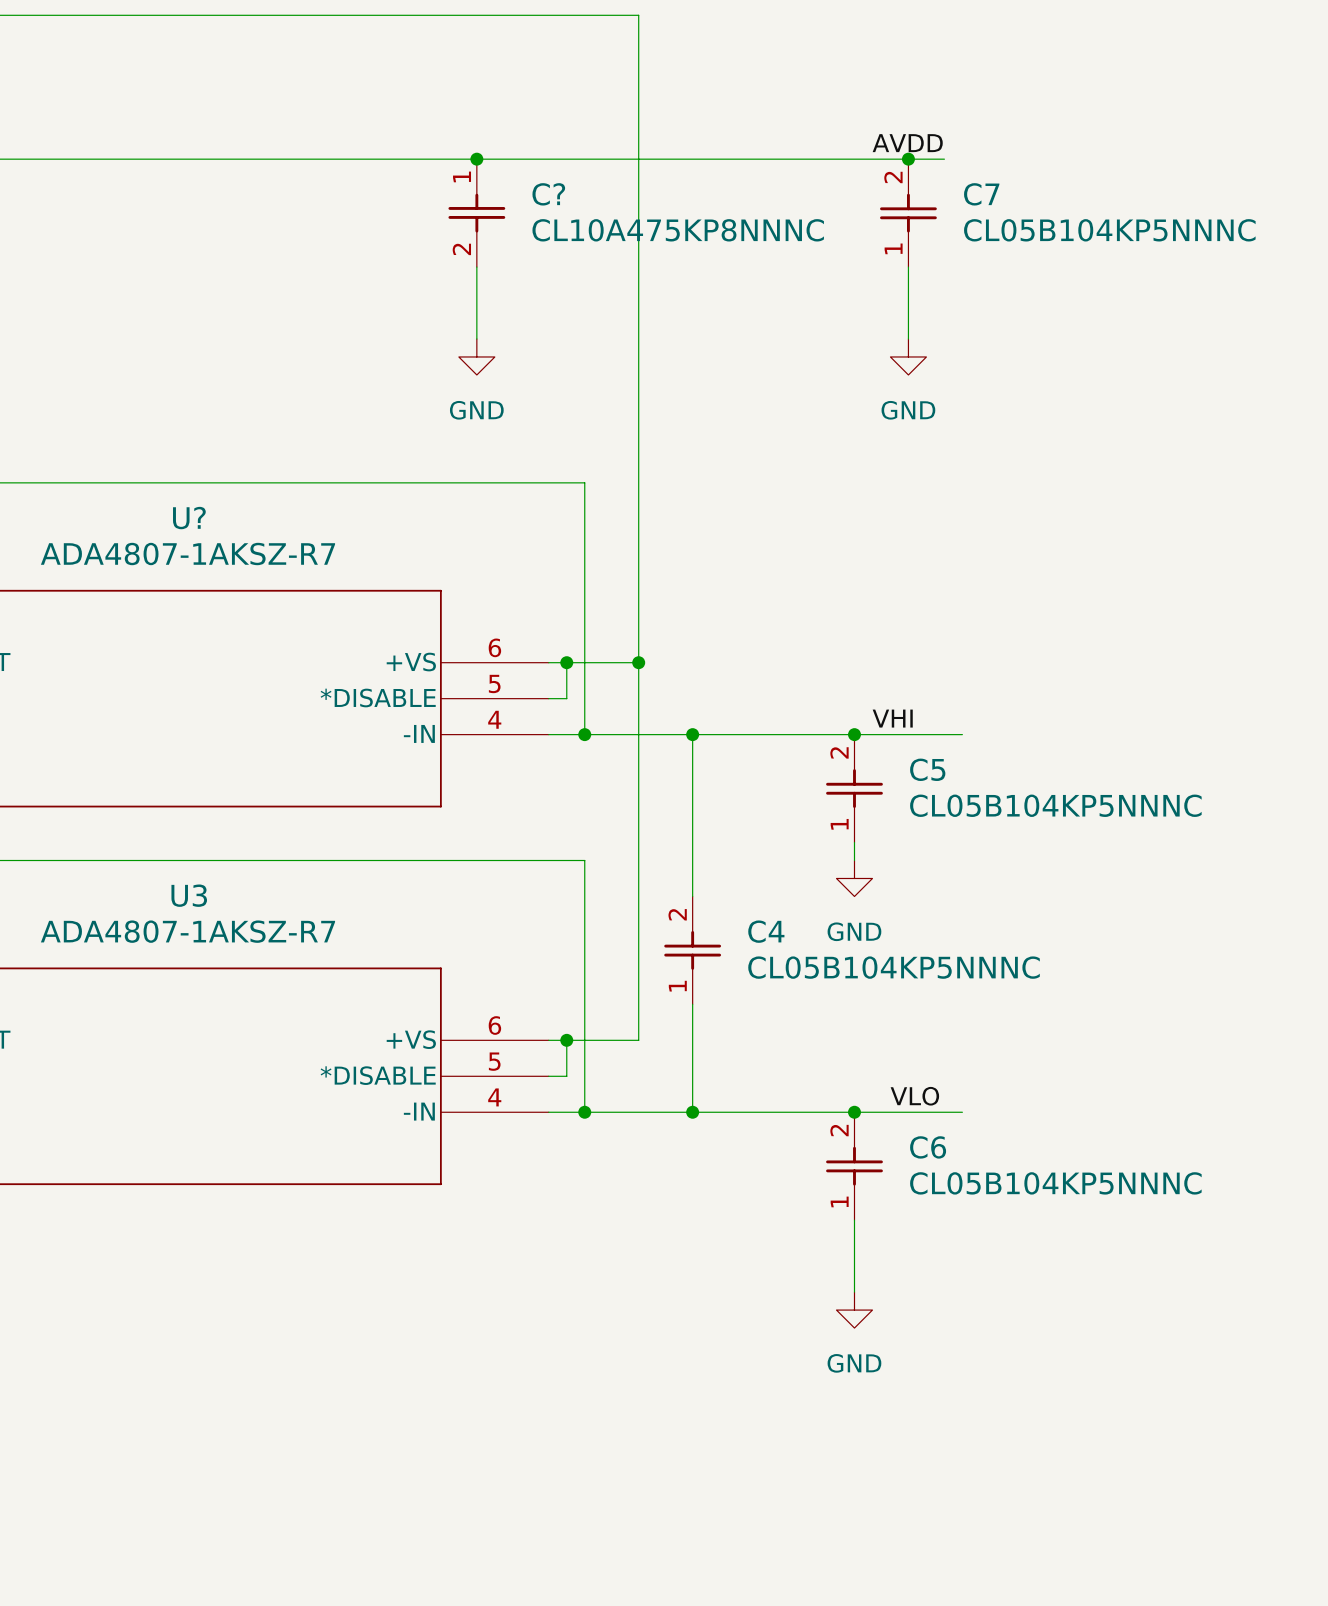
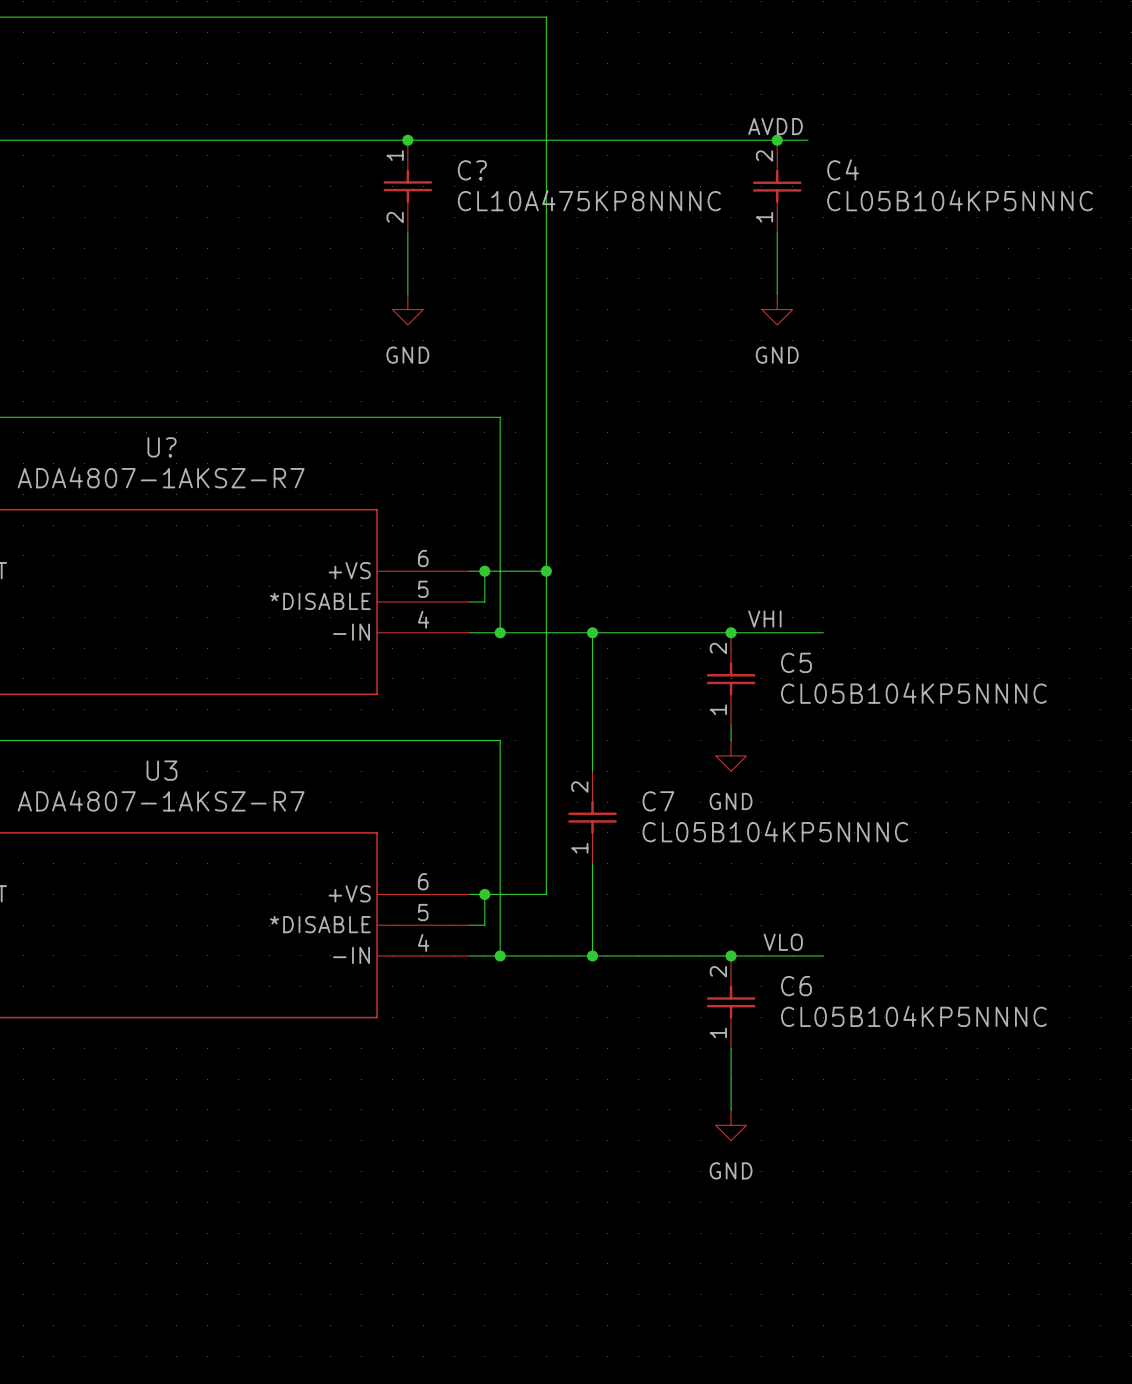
C7 name: C7 (981, 194) -> C4 (843, 169)
C4 name: C4 (766, 931) -> C7 (658, 801)

